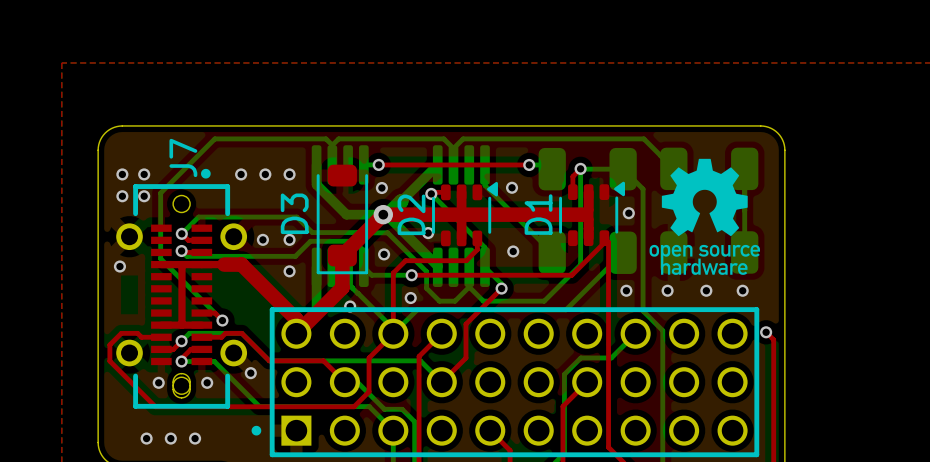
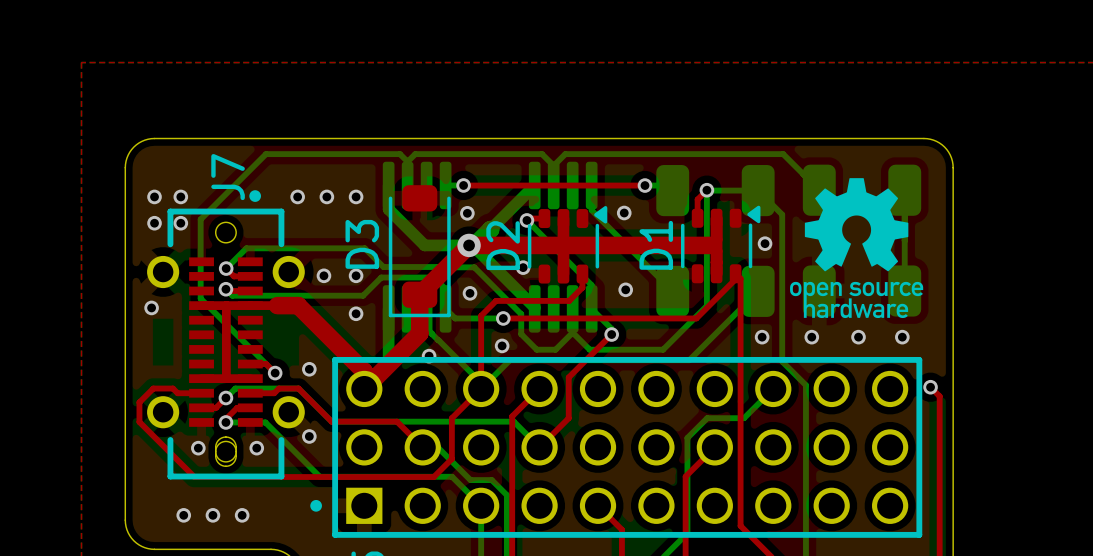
via: none -> (309, 369)

